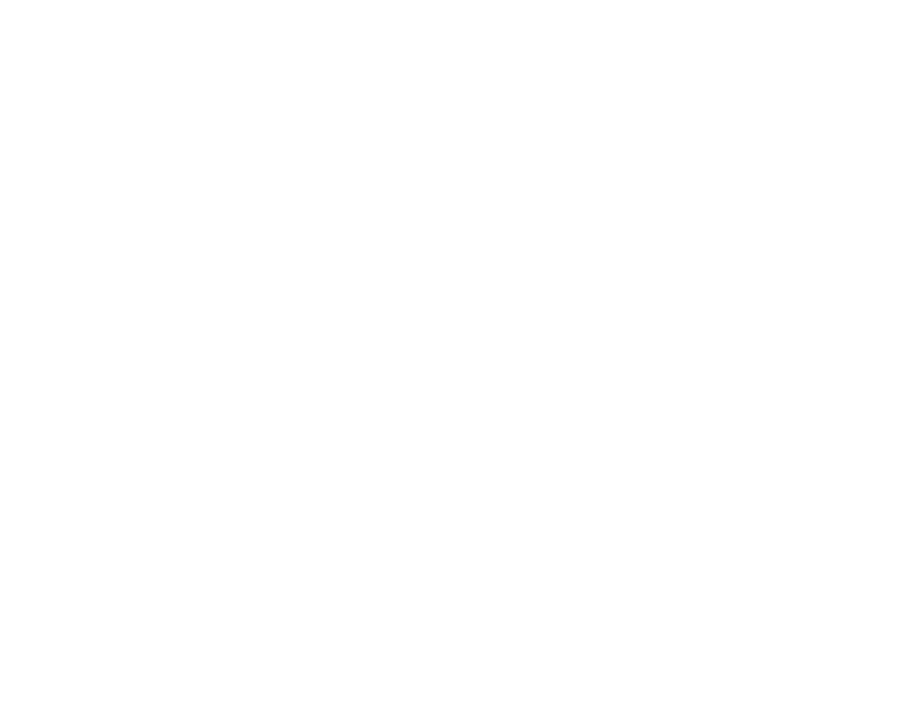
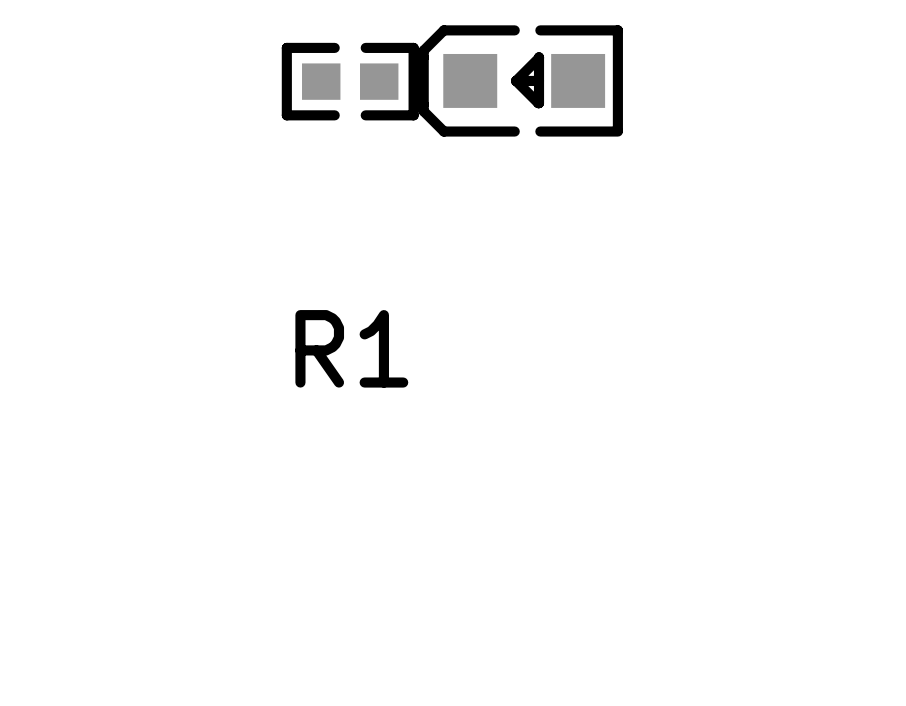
part: none -> (520, 80)
R1: none -> (350, 81)

